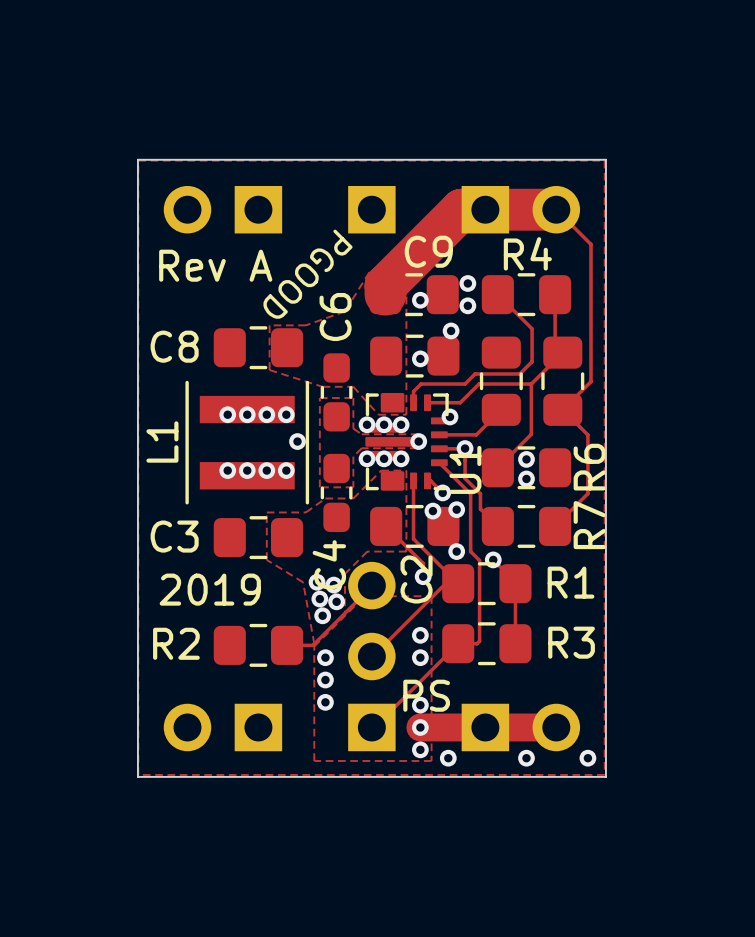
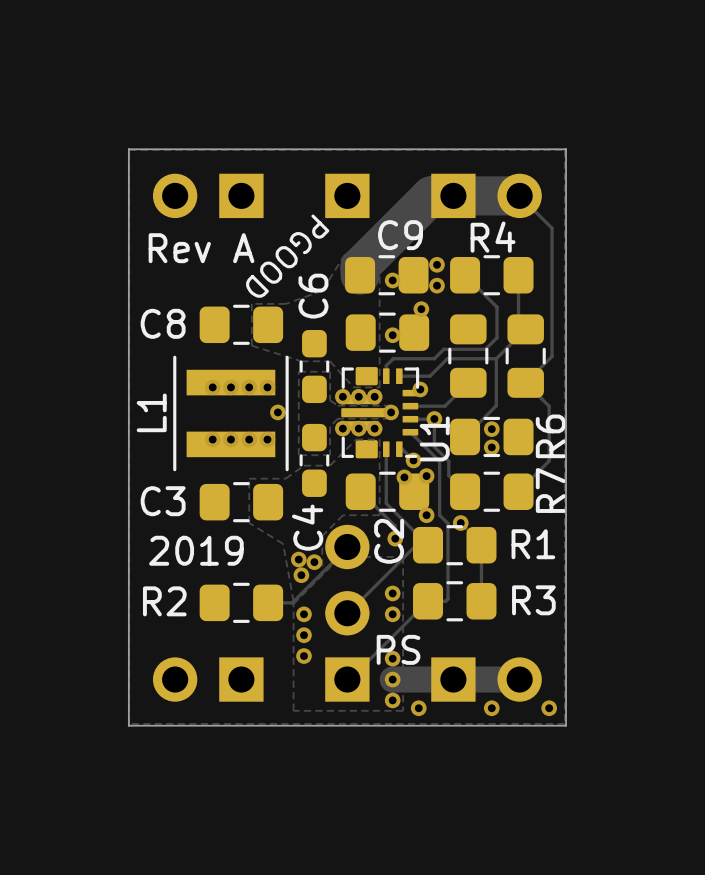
via: (317, 582) -> none
via: (333, 585) -> none

